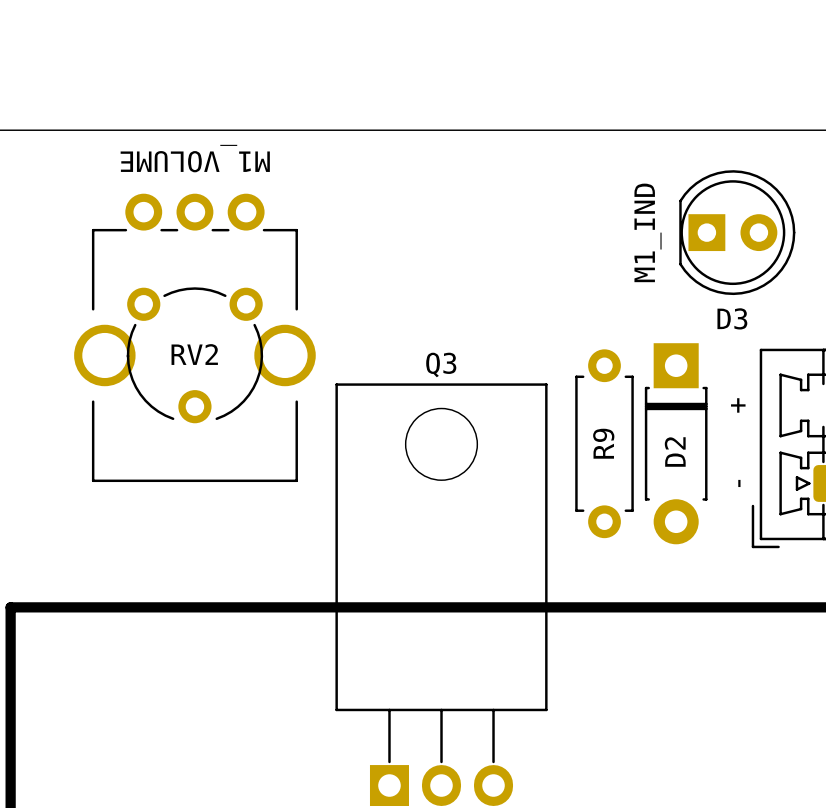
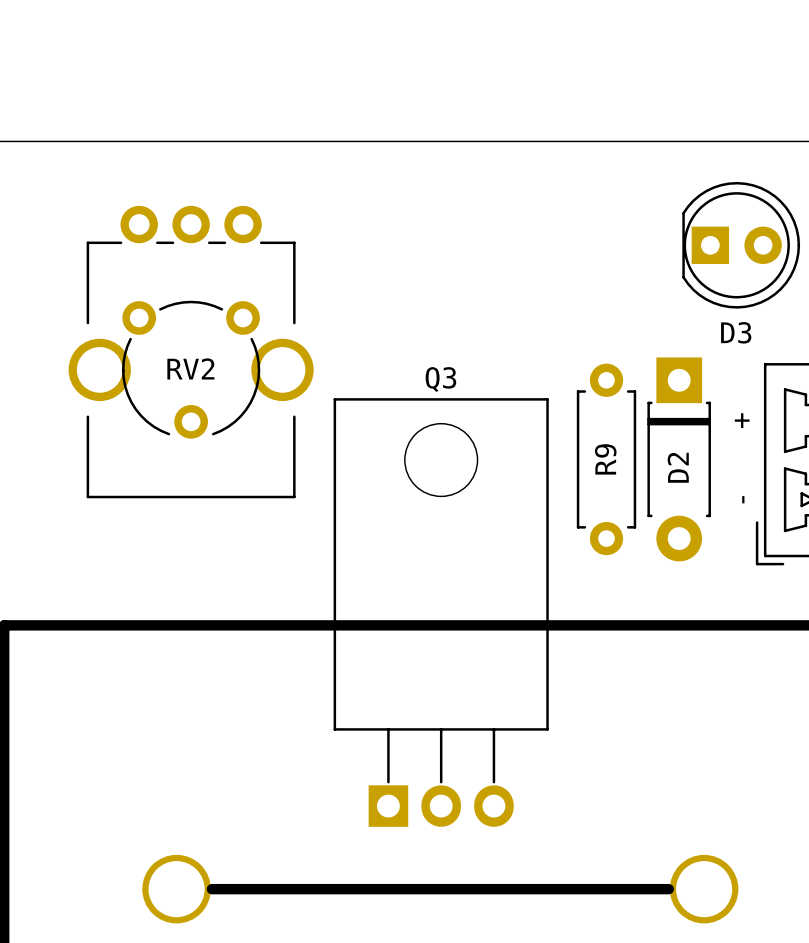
text: M1_VOLUME (195, 158) -> none
text: M1_IND (648, 232) -> none

